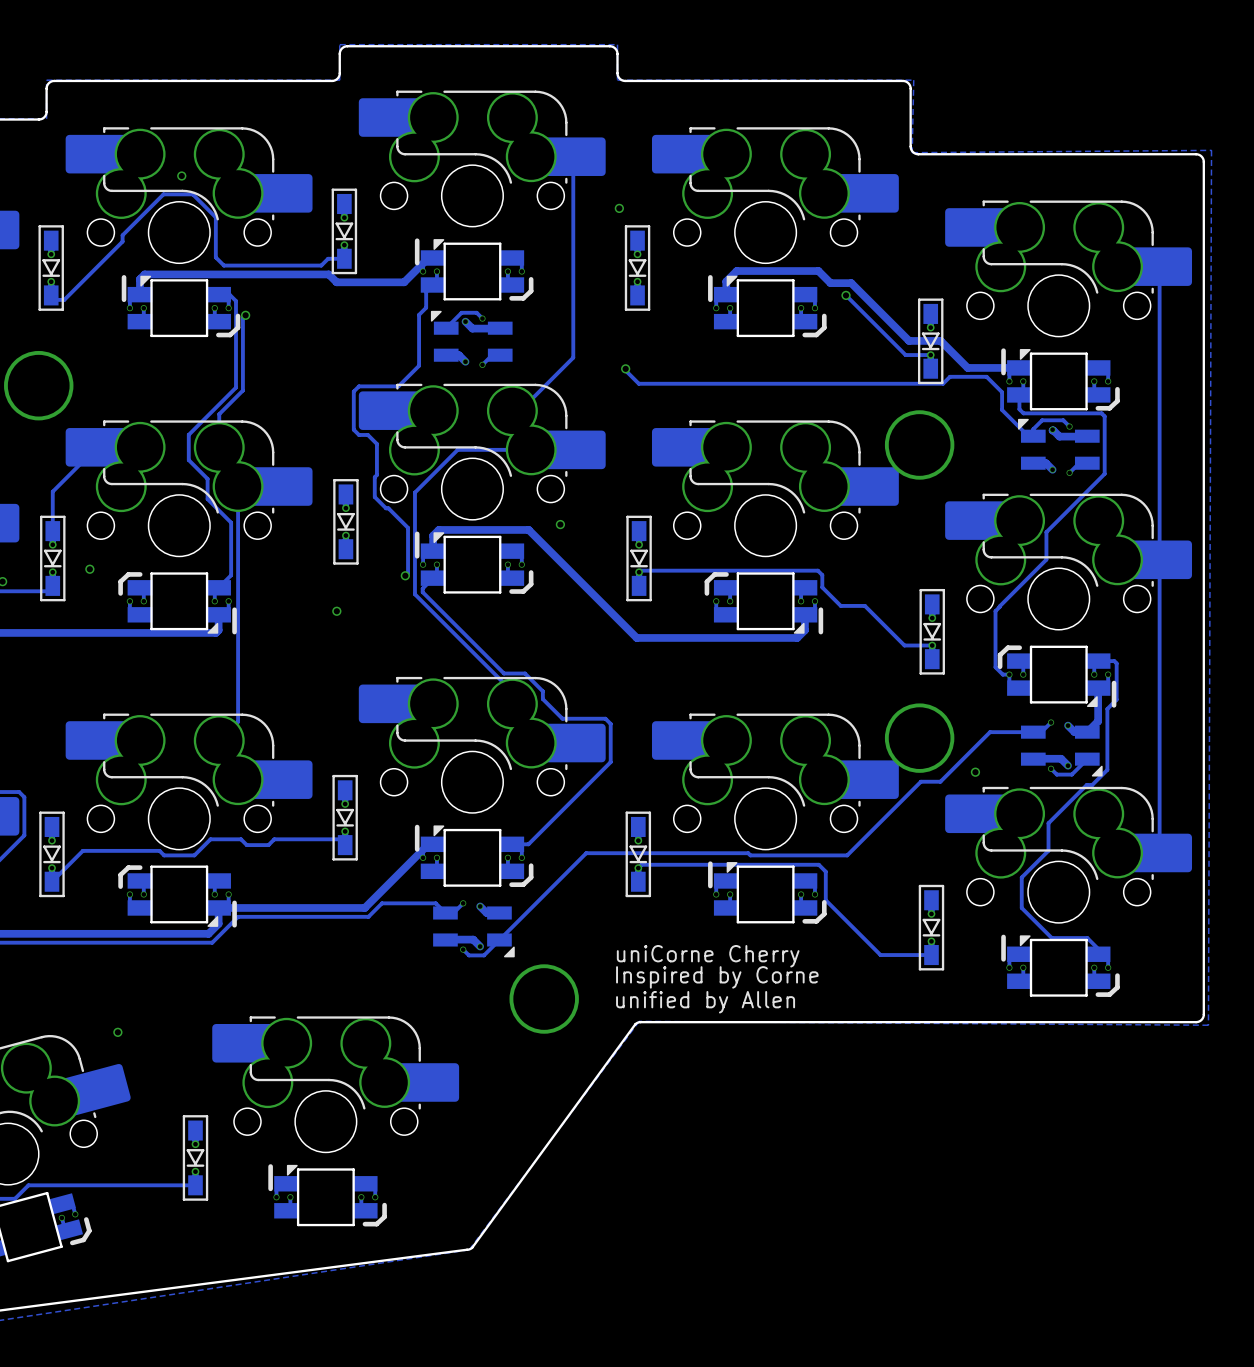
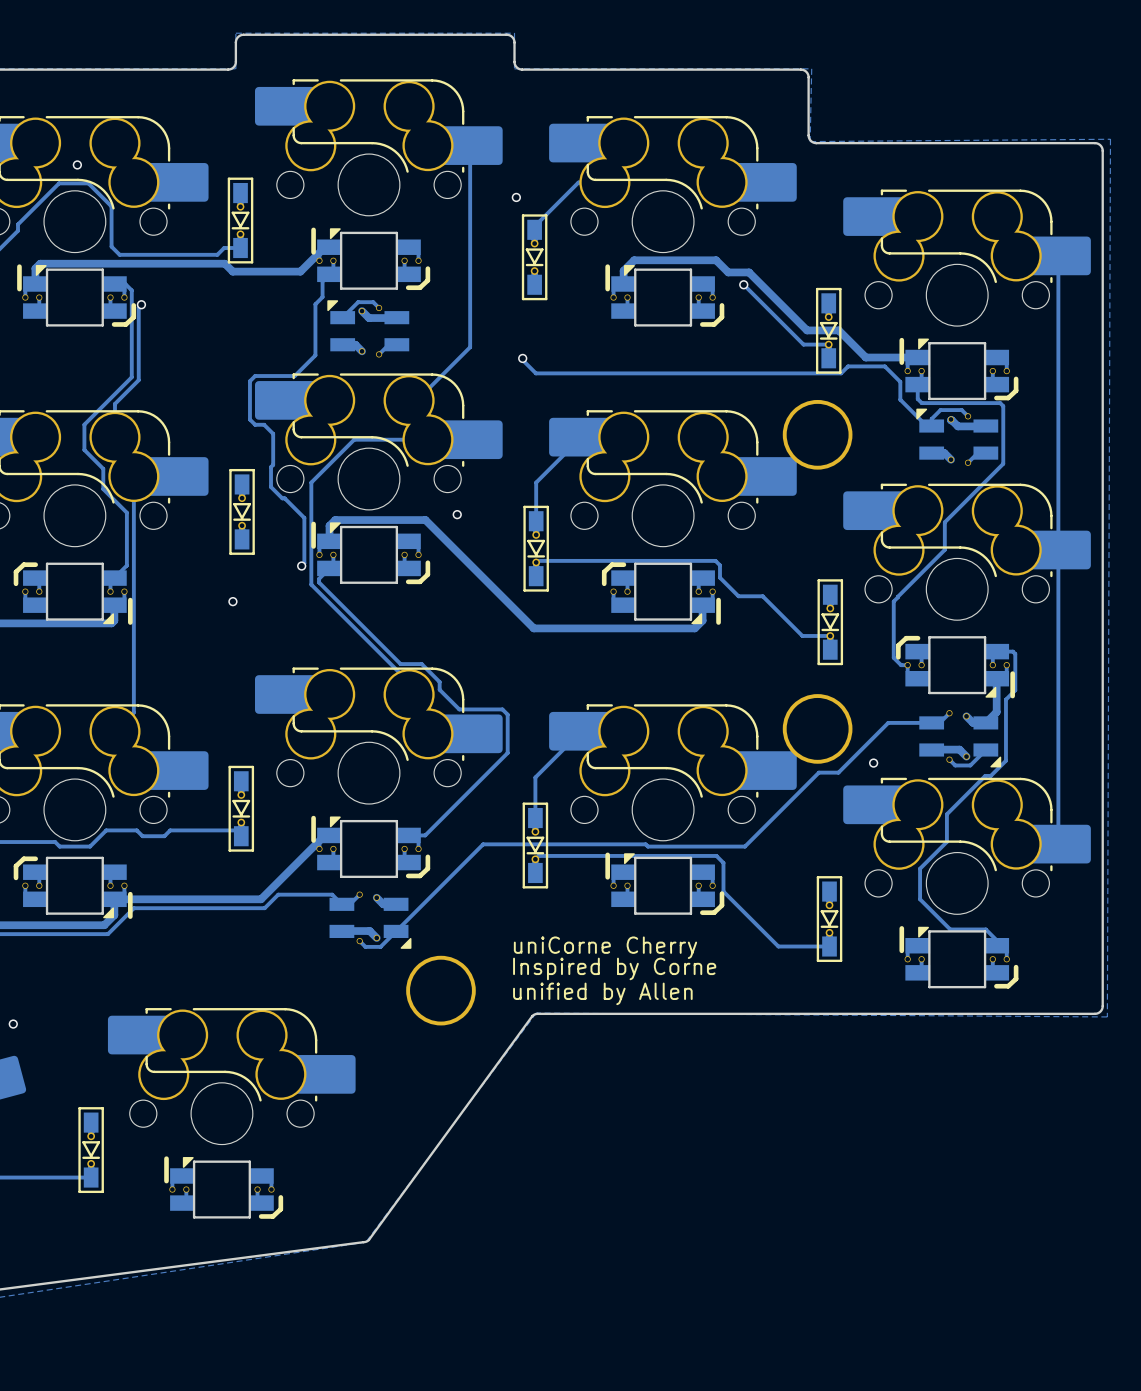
track: none -> (604, 182) (578, 182) (534, 226)
track: none -> (581, 437) (536, 482) (536, 521)
track: none -> (581, 731) (535, 777) (535, 818)

